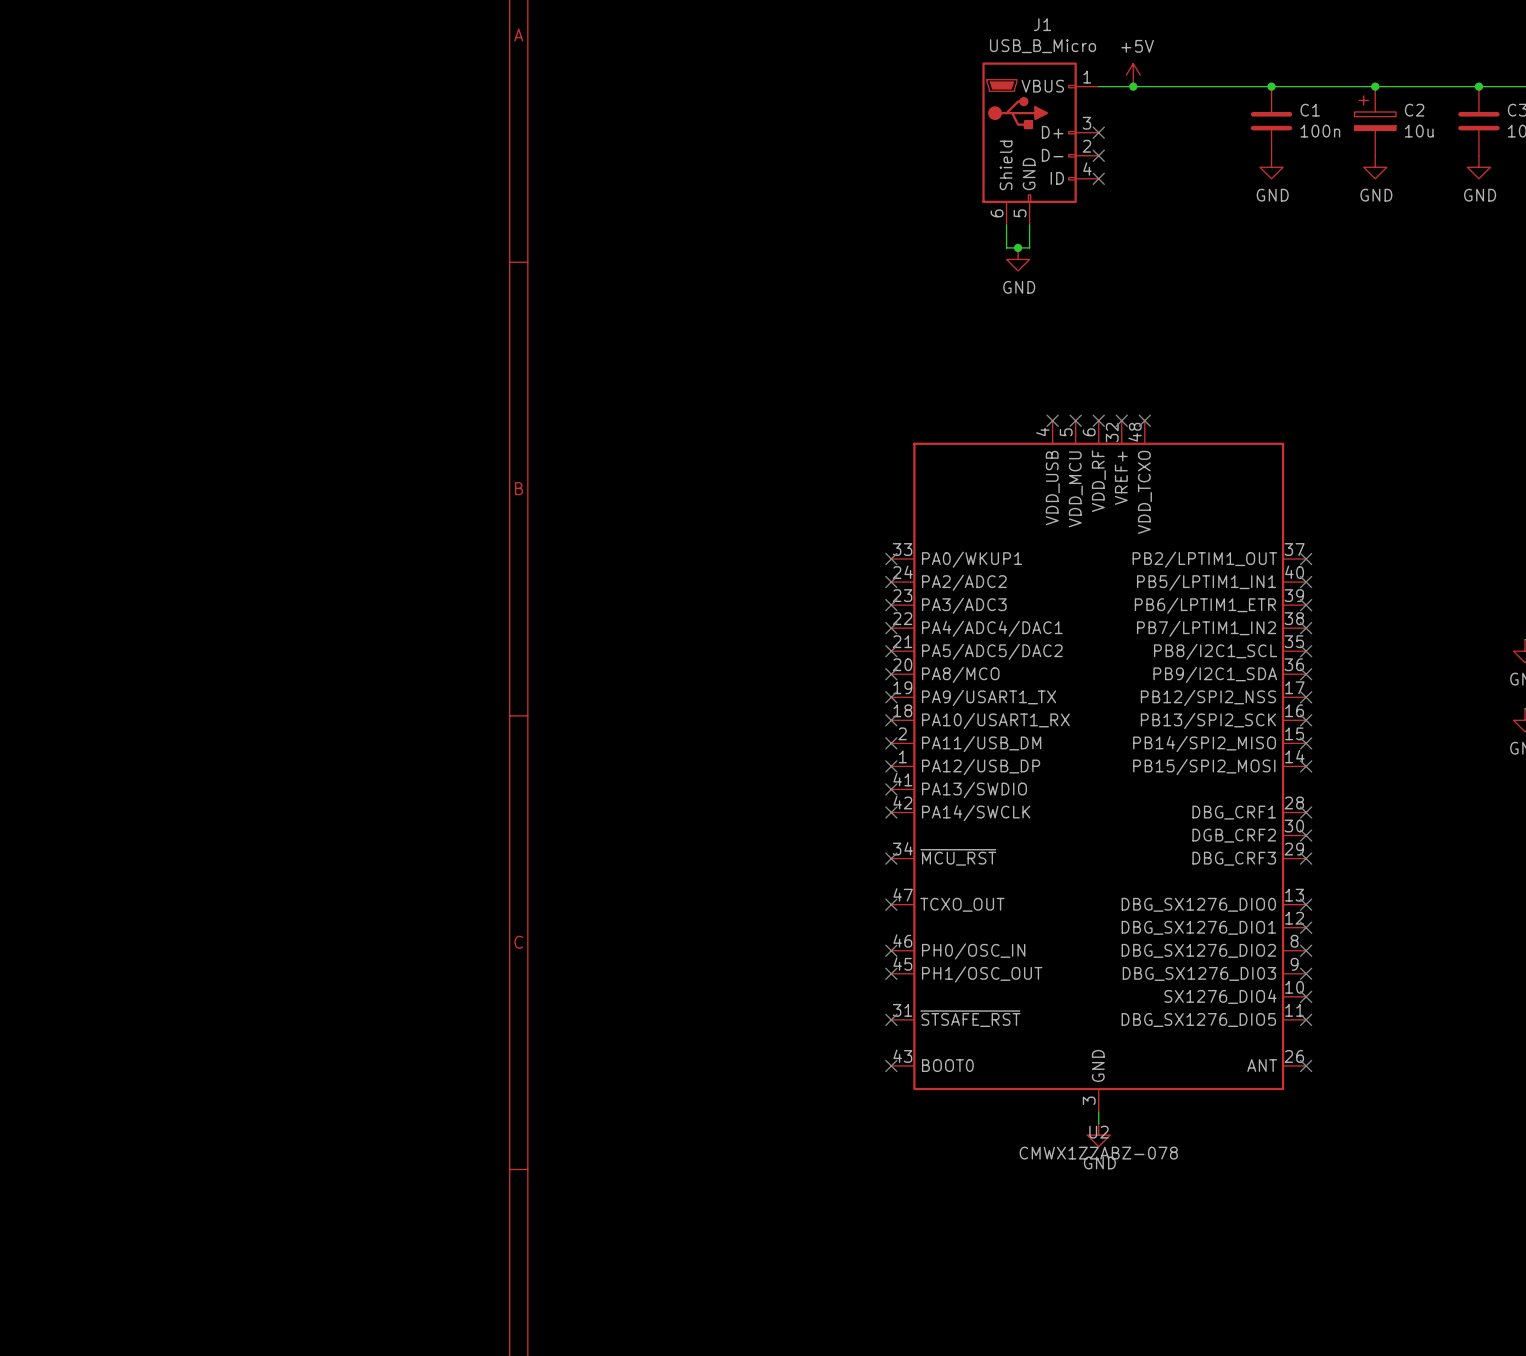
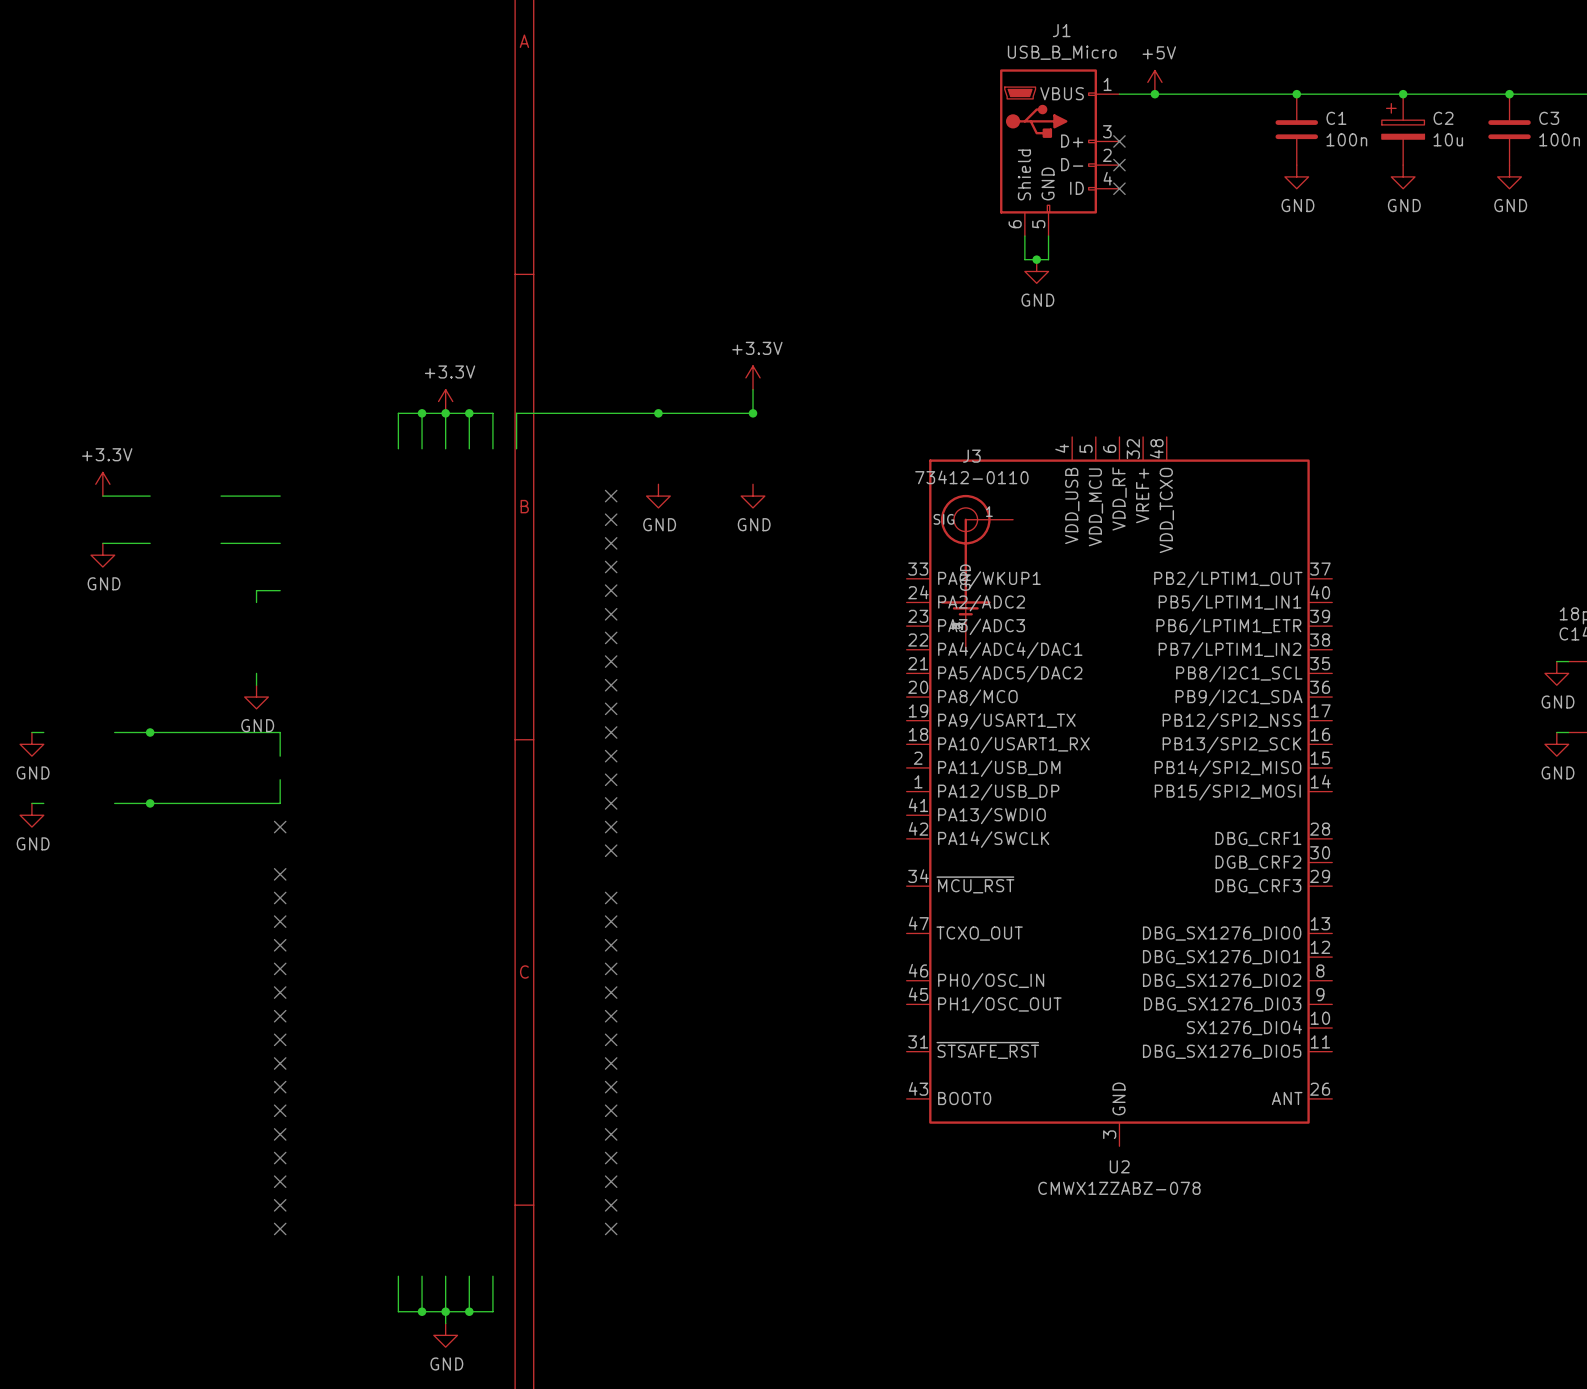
power symbol: none -> +3.3V (753, 377)
wire: none -> (753, 389) (753, 413) (516, 413) (516, 448)
power symbol: none -> +3.3V (445, 401)
wire: none -> (422, 413) (422, 448)
junction: none -> (422, 413)
wire: none -> (445, 413) (445, 448)
junction: none -> (445, 413)
wire: none -> (469, 413) (469, 448)
junction: none -> (469, 413)
junction: none -> (658, 413)
junction: none -> (753, 413)
no-connect mark: (1052, 420) -> none
no-connect mark: (1075, 420) -> none
no-connect mark: (1098, 420) -> none
no-connect mark: (1121, 420) -> none
no-connect mark: (1144, 420) -> none
wire: none -> (398, 448) (398, 413) (492, 413) (492, 448)
power symbol: none -> +3.3V (102, 484)
wire: none -> (102, 496) (150, 496)
wire: none -> (221, 496) (280, 496)
no-connect mark: none -> (611, 496)
power symbol: none -> GND (658, 496)
power symbol: none -> GND (753, 496)
no-connect mark: none -> (611, 519)
wire: none -> (102, 543) (150, 543)
wire: none -> (221, 543) (280, 543)
no-connect mark: none -> (611, 543)
power symbol: none -> GND (102, 555)
no-connect mark: none -> (611, 567)
J3: none -> 73412-0110 (977, 572)
no-connect mark: (891, 559) -> none
no-connect mark: (1306, 559) -> none
wire: none -> (280, 590) (256, 590) (256, 602)
no-connect mark: none -> (611, 590)
no-connect mark: (891, 582) -> none
no-connect mark: (1306, 582) -> none
no-connect mark: none -> (611, 614)
no-connect mark: (891, 605) -> none
no-connect mark: (1306, 605) -> none
no-connect mark: none -> (611, 637)
no-connect mark: (891, 628) -> none
no-connect mark: (1306, 628) -> none
no-connect mark: none -> (611, 661)
wire: none -> (256, 673) (256, 685)
no-connect mark: (891, 651) -> none
no-connect mark: (1306, 651) -> none
no-connect mark: none -> (611, 685)
power symbol: none -> GND (256, 697)
no-connect mark: (891, 674) -> none
no-connect mark: (1306, 674) -> none
no-connect mark: none -> (611, 708)
no-connect mark: (891, 697) -> none
no-connect mark: (1306, 697) -> none
wire: none -> (31, 732) (43, 732)
wire: none -> (114, 732) (280, 732) (280, 756)
junction: none -> (150, 732)
no-connect mark: none -> (611, 732)
power symbol: none -> GND (31, 744)
no-connect mark: (891, 720) -> none
no-connect mark: (1306, 720) -> none
no-connect mark: none -> (611, 756)
no-connect mark: (891, 743) -> none
no-connect mark: (1306, 743) -> none
wire: none -> (280, 779) (280, 803) (114, 803)
no-connect mark: none -> (611, 779)
no-connect mark: (891, 766) -> none
no-connect mark: (1306, 766) -> none
wire: none -> (31, 803) (43, 803)
junction: none -> (150, 803)
no-connect mark: none -> (611, 803)
power symbol: none -> GND (31, 815)
no-connect mark: (891, 789) -> none
no-connect mark: none -> (280, 827)
no-connect mark: none -> (611, 827)
no-connect mark: (891, 812) -> none
no-connect mark: (1306, 812) -> none
no-connect mark: none -> (611, 850)
no-connect mark: (1306, 835) -> none
no-connect mark: none -> (280, 874)
no-connect mark: (891, 858) -> none
no-connect mark: (1306, 858) -> none
no-connect mark: none -> (280, 897)
no-connect mark: none -> (611, 897)
no-connect mark: none -> (280, 921)
no-connect mark: none -> (611, 921)
no-connect mark: (891, 904) -> none
no-connect mark: (1306, 904) -> none
no-connect mark: none -> (280, 945)
no-connect mark: none -> (611, 945)
no-connect mark: (1306, 927) -> none
no-connect mark: none -> (280, 968)
no-connect mark: none -> (611, 968)
no-connect mark: (891, 950) -> none
no-connect mark: (1306, 950) -> none
no-connect mark: none -> (280, 992)
no-connect mark: none -> (611, 992)
no-connect mark: (891, 973) -> none
no-connect mark: (1306, 973) -> none
no-connect mark: none -> (280, 1016)
no-connect mark: none -> (611, 1016)
no-connect mark: (1306, 996) -> none
no-connect mark: none -> (280, 1039)
no-connect mark: none -> (611, 1039)
no-connect mark: (891, 1019) -> none
no-connect mark: (1306, 1019) -> none
no-connect mark: none -> (280, 1063)
no-connect mark: none -> (611, 1063)
no-connect mark: none -> (280, 1087)
no-connect mark: none -> (611, 1087)
no-connect mark: (891, 1065) -> none
no-connect mark: (1306, 1065) -> none
no-connect mark: none -> (280, 1110)
no-connect mark: none -> (611, 1110)
no-connect mark: none -> (280, 1134)
no-connect mark: none -> (611, 1134)
wire: (1098, 1112) (1098, 1123) -> none
no-connect mark: none -> (280, 1158)
no-connect mark: none -> (611, 1158)
power symbol: GND (1098, 1135) -> none
no-connect mark: none -> (280, 1181)
no-connect mark: none -> (611, 1181)
no-connect mark: none -> (280, 1205)
no-connect mark: none -> (611, 1205)
no-connect mark: none -> (280, 1228)
no-connect mark: none -> (611, 1228)
wire: none -> (398, 1276) (398, 1311) (492, 1311) (492, 1276)
wire: none -> (422, 1276) (422, 1311)
wire: none -> (445, 1276) (445, 1323)
wire: none -> (469, 1276) (469, 1311)
junction: none -> (422, 1311)
junction: none -> (445, 1311)
junction: none -> (469, 1311)
power symbol: none -> GND (445, 1335)

